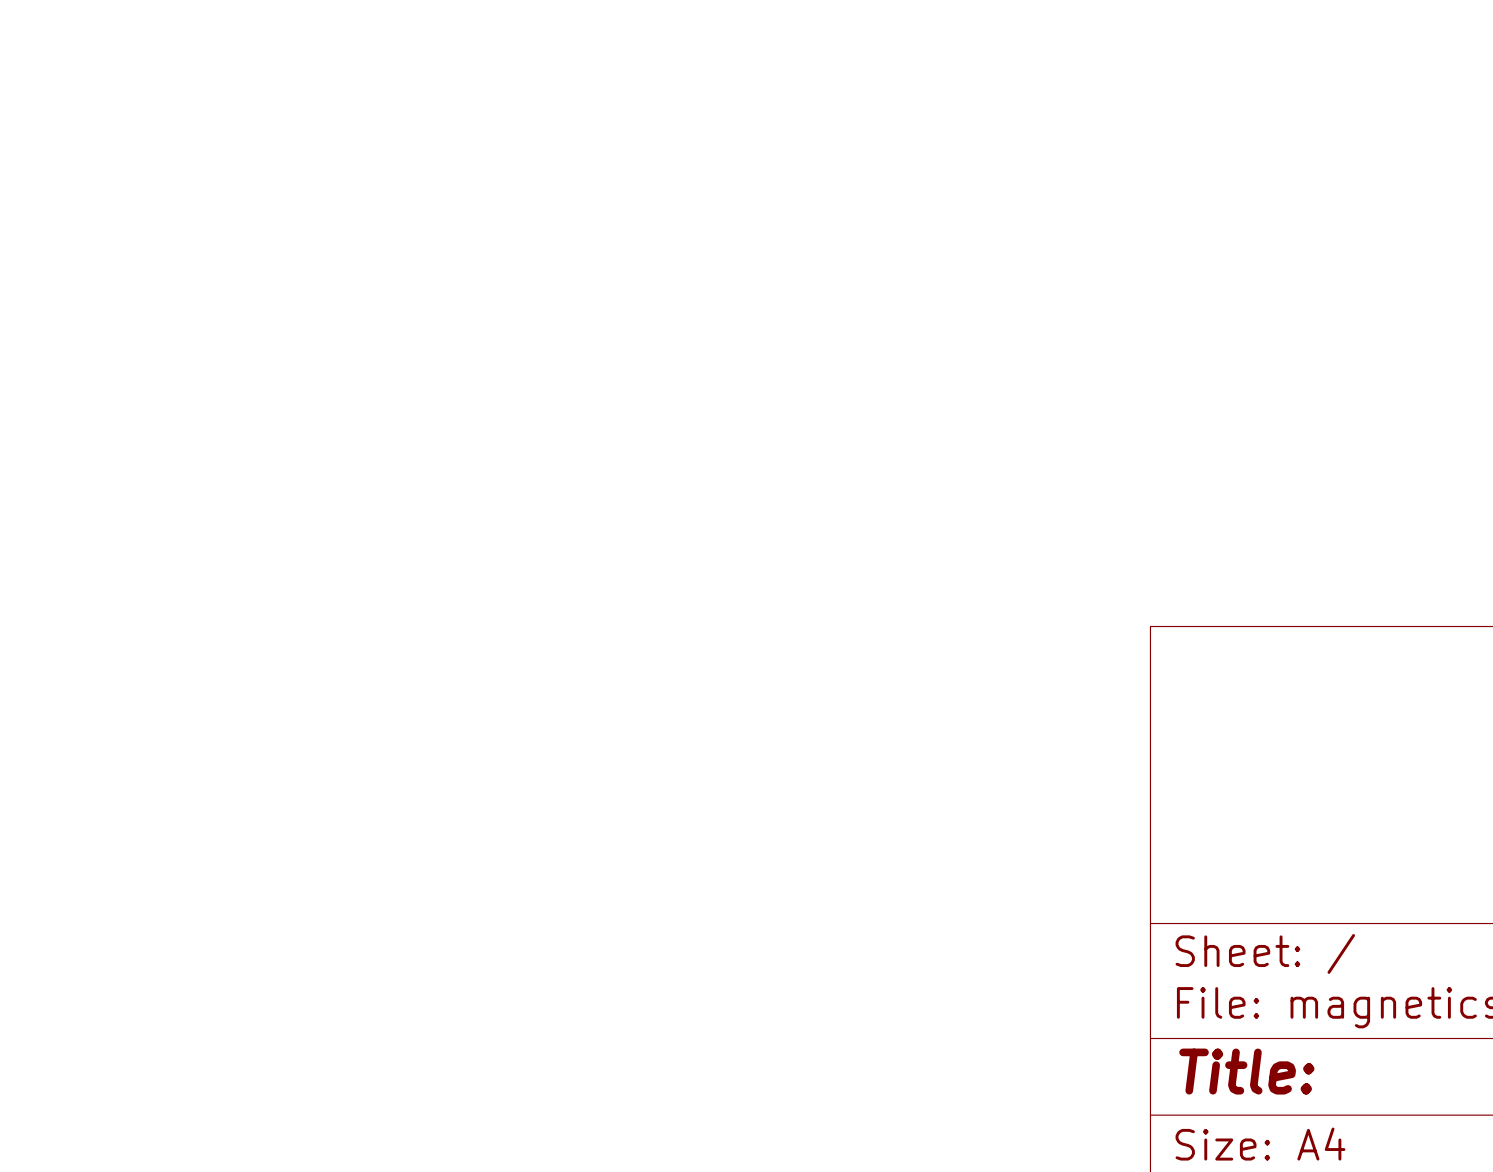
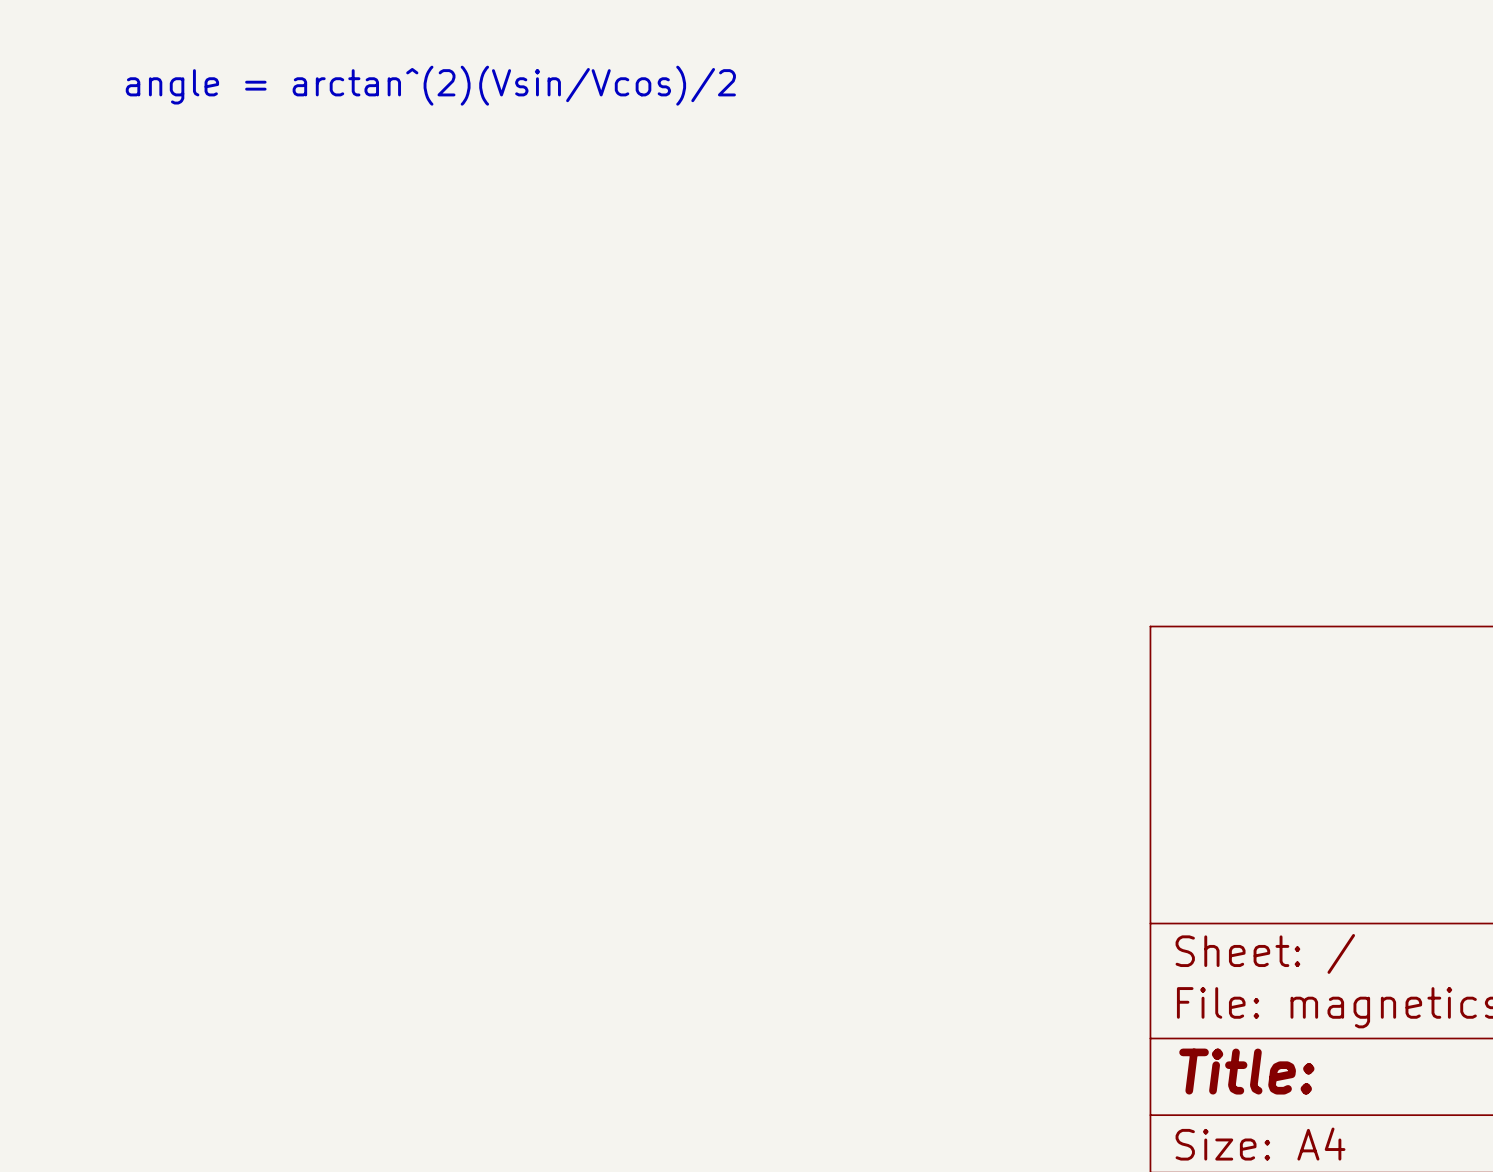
text: none -> angle = arctan^(2)(Vsin/Vcos)/2 (430, 85)

